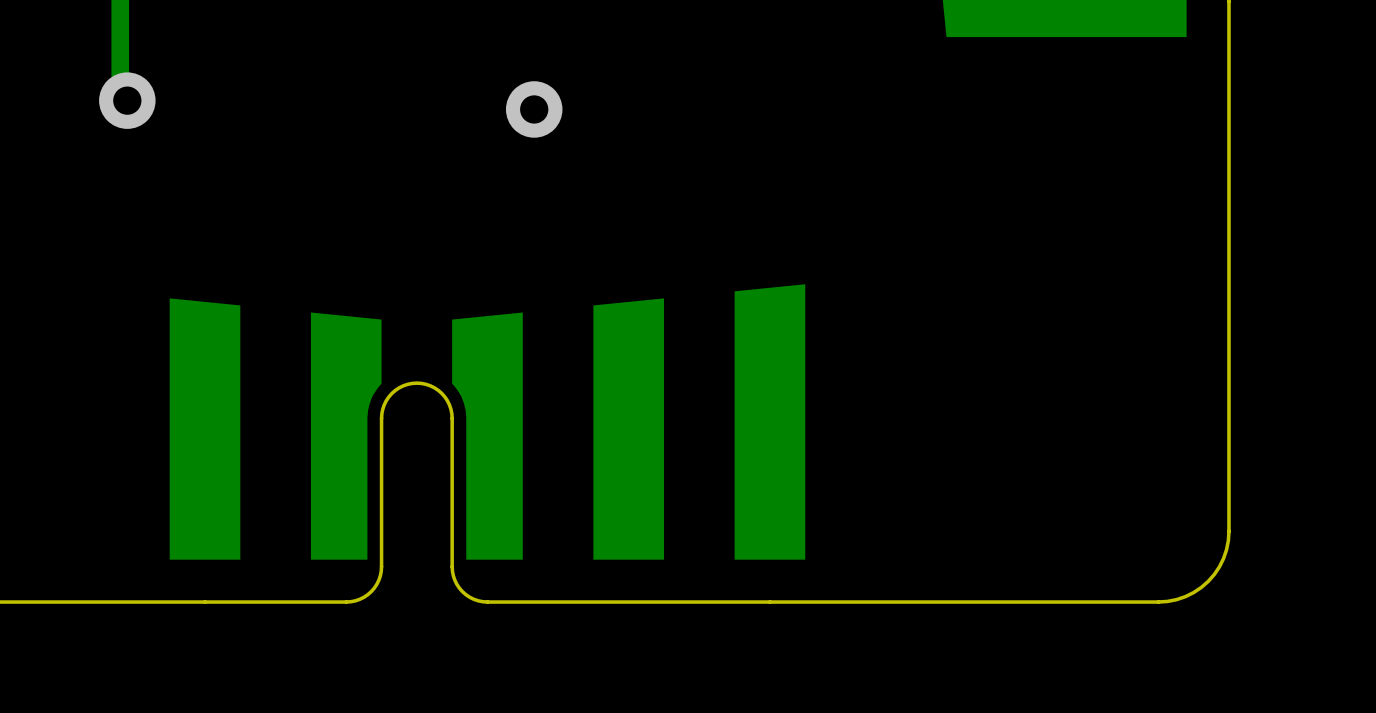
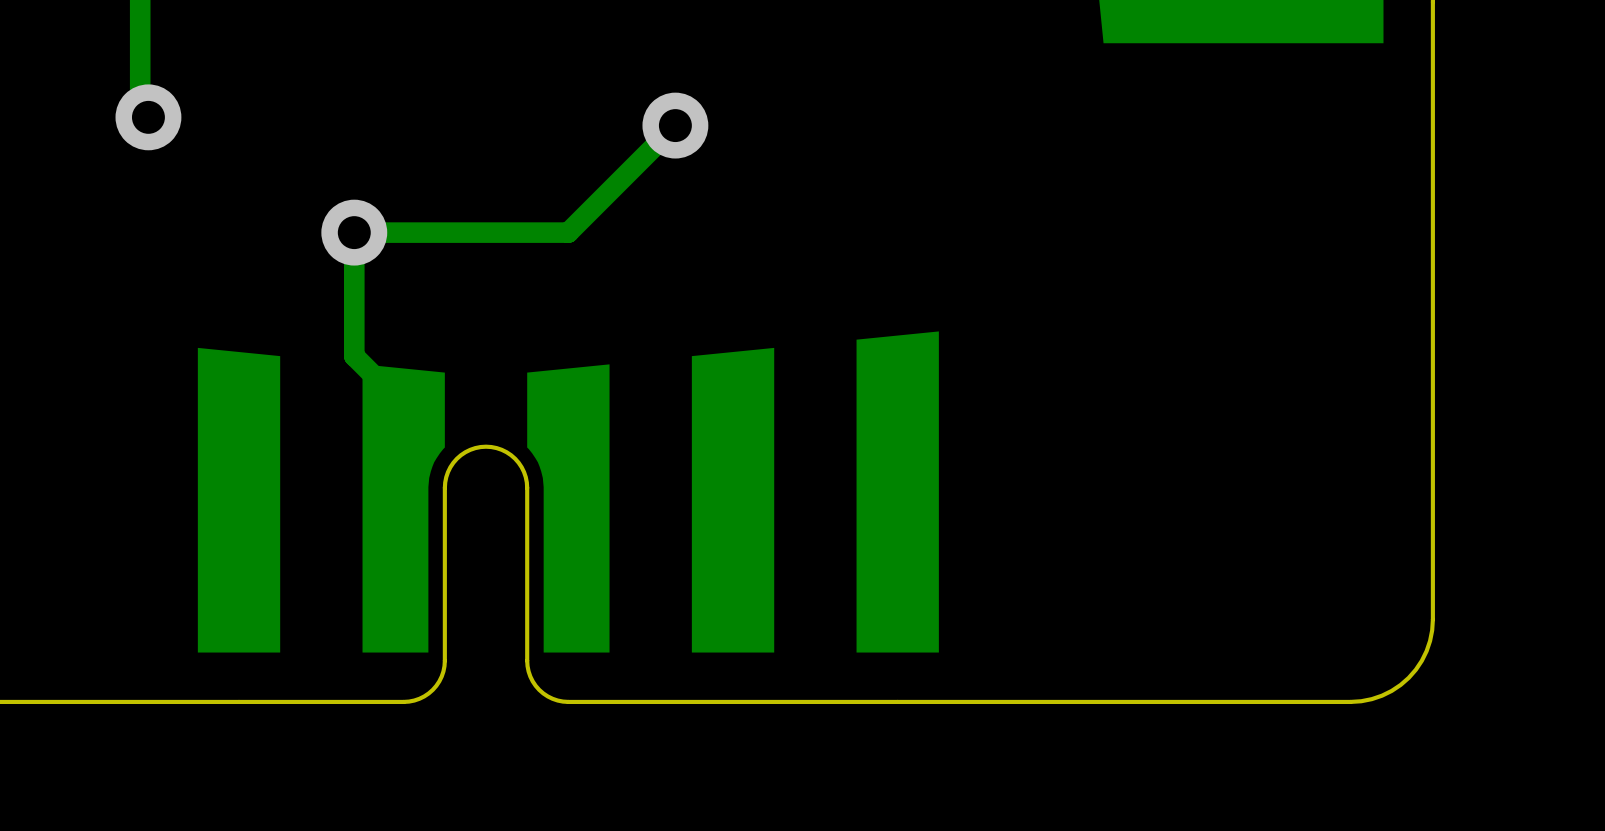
track: none -> (675, 125) (568, 232) (354, 232) (354, 356) (403, 405) (403, 529)
via position: (534, 109) -> (675, 125)
via: none -> (354, 232)

